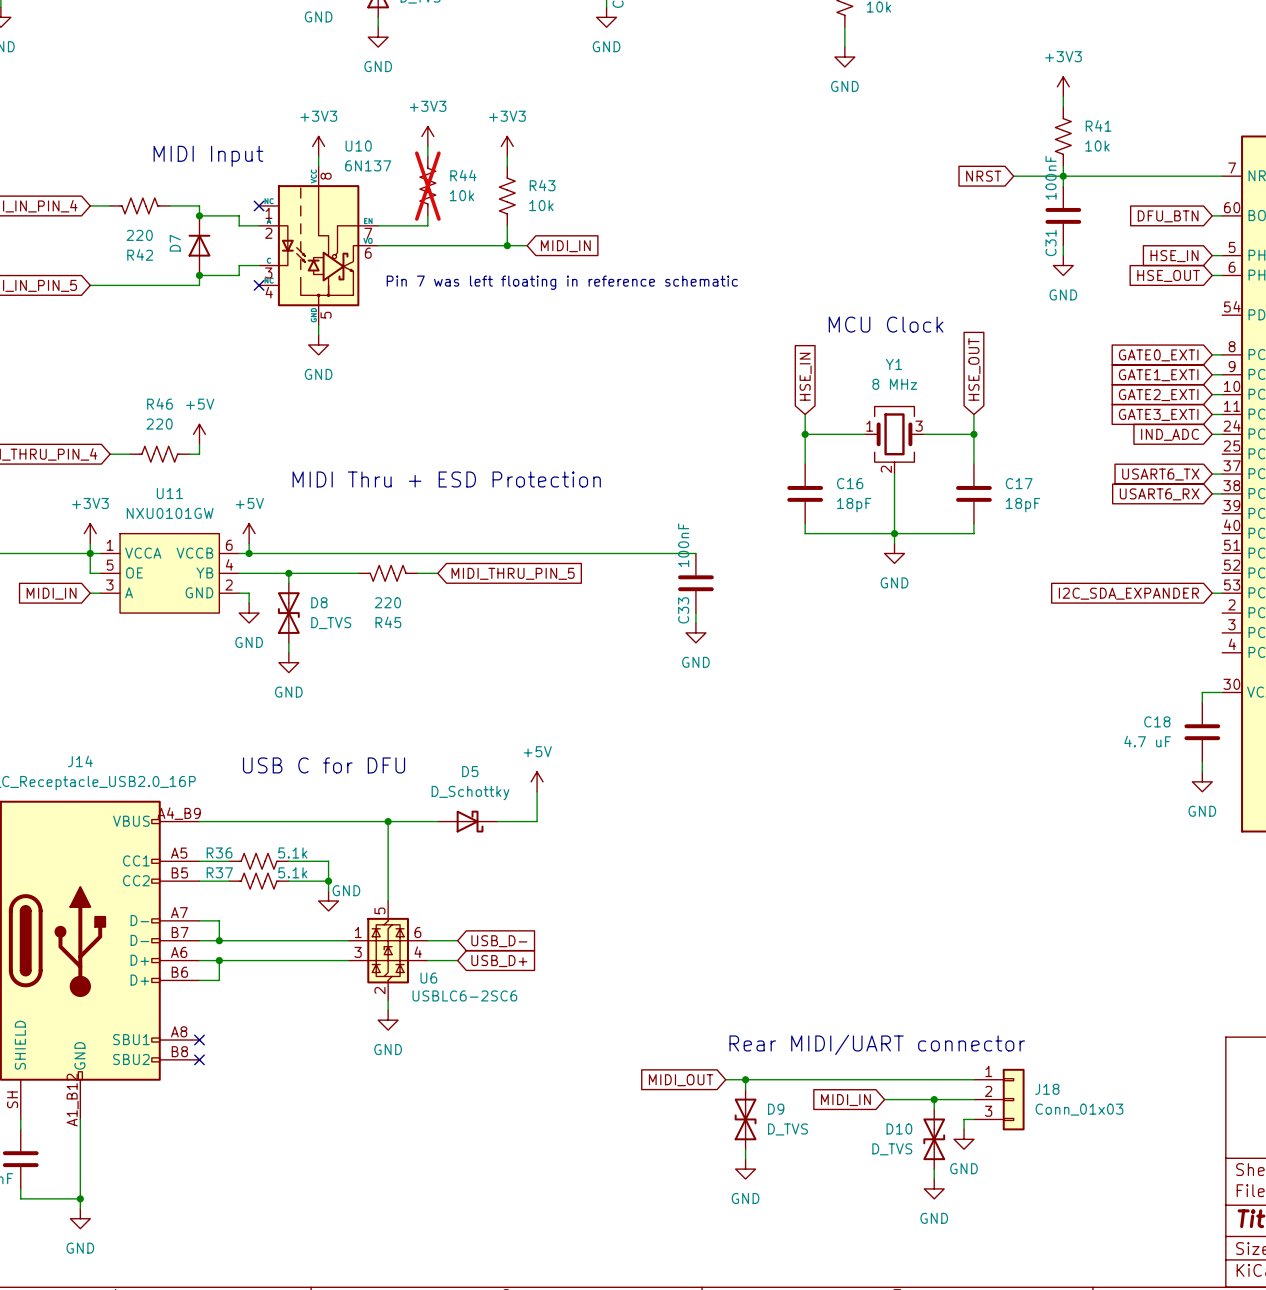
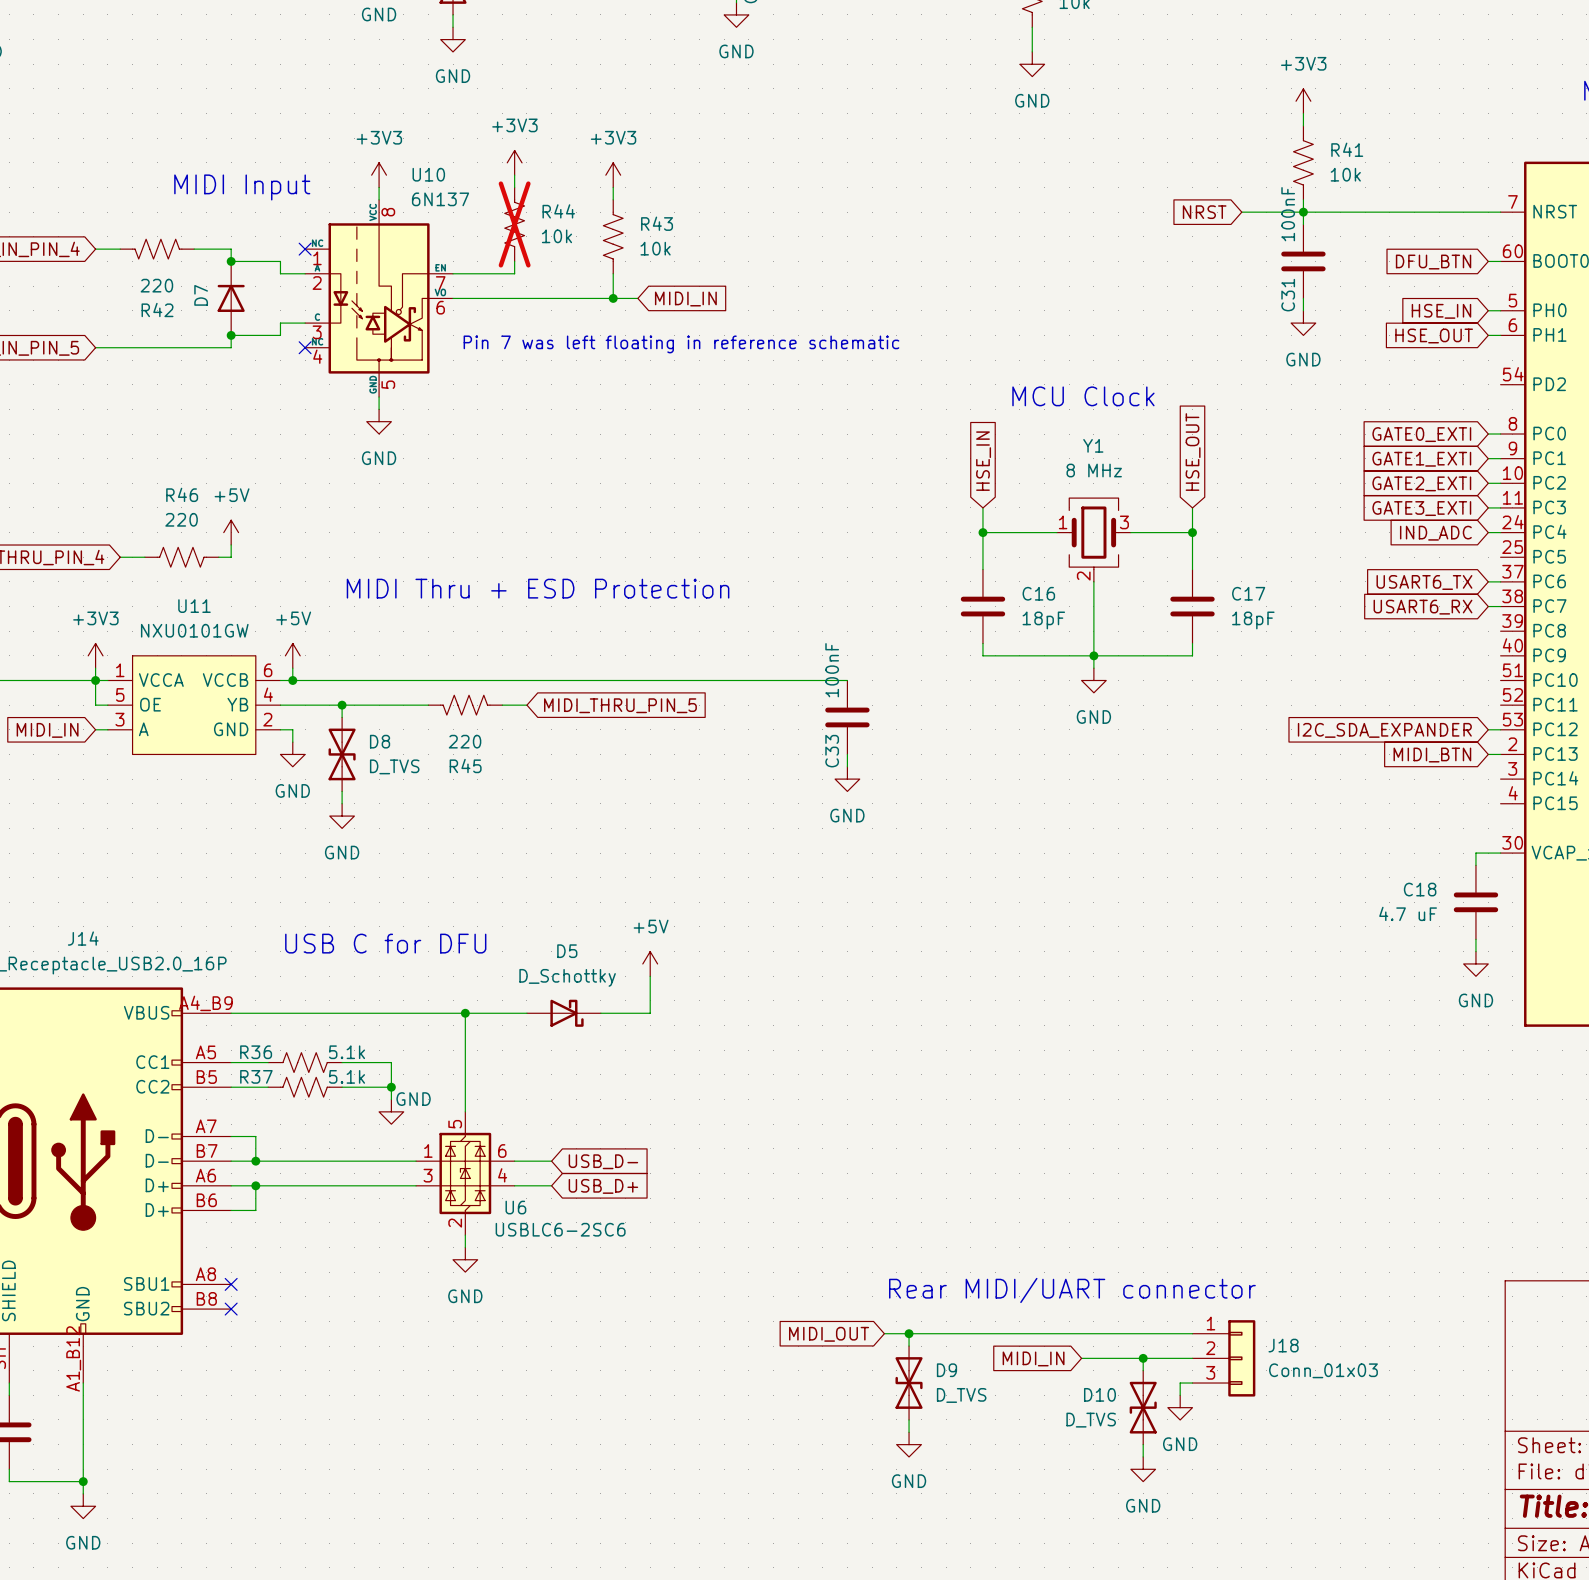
global label: none -> MIDI_BTN (1432, 755)
wire: none -> (1488, 754) (1500, 754)

